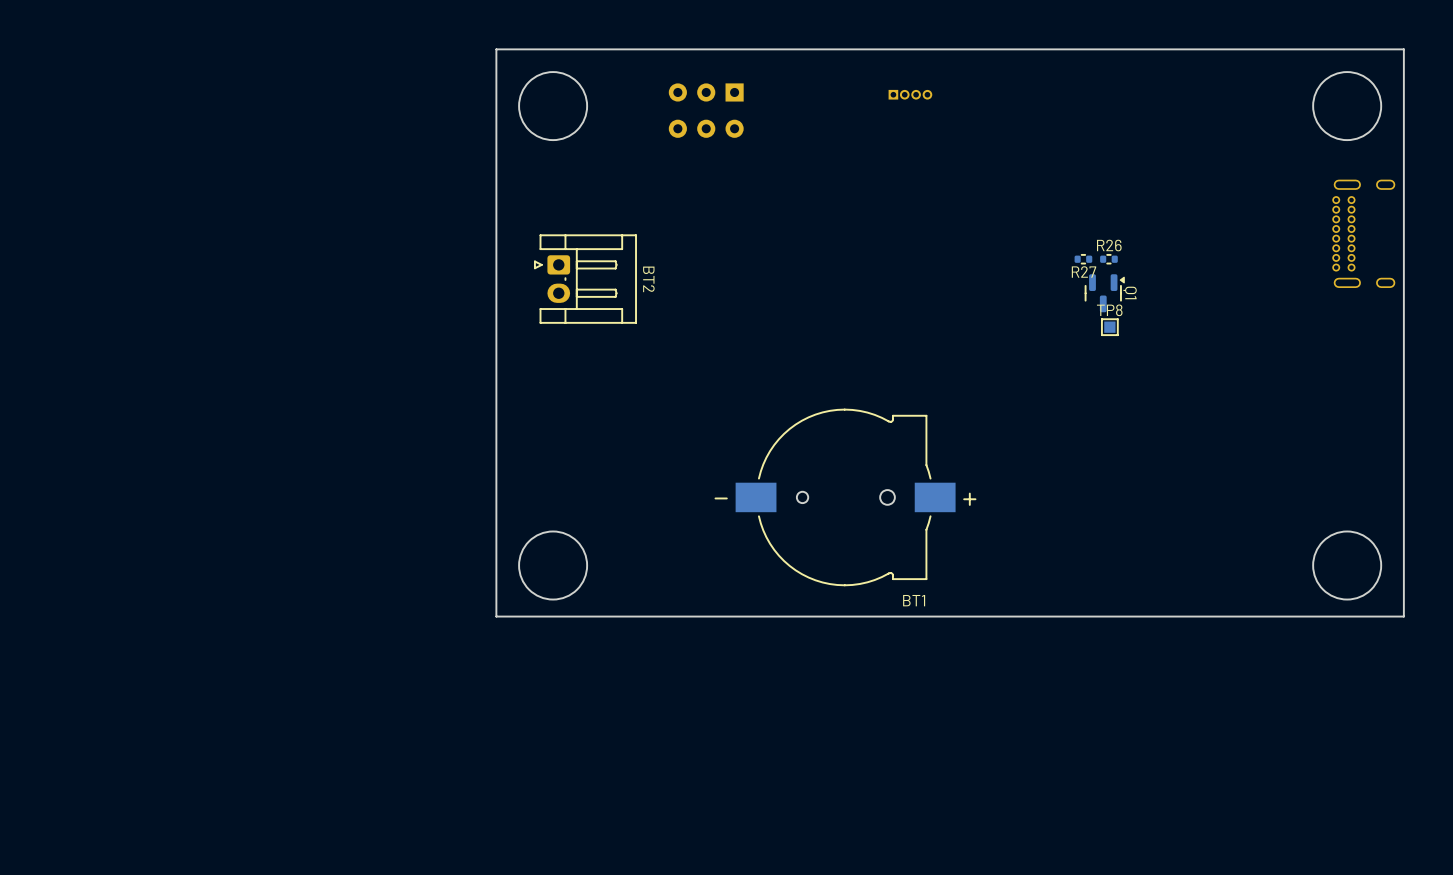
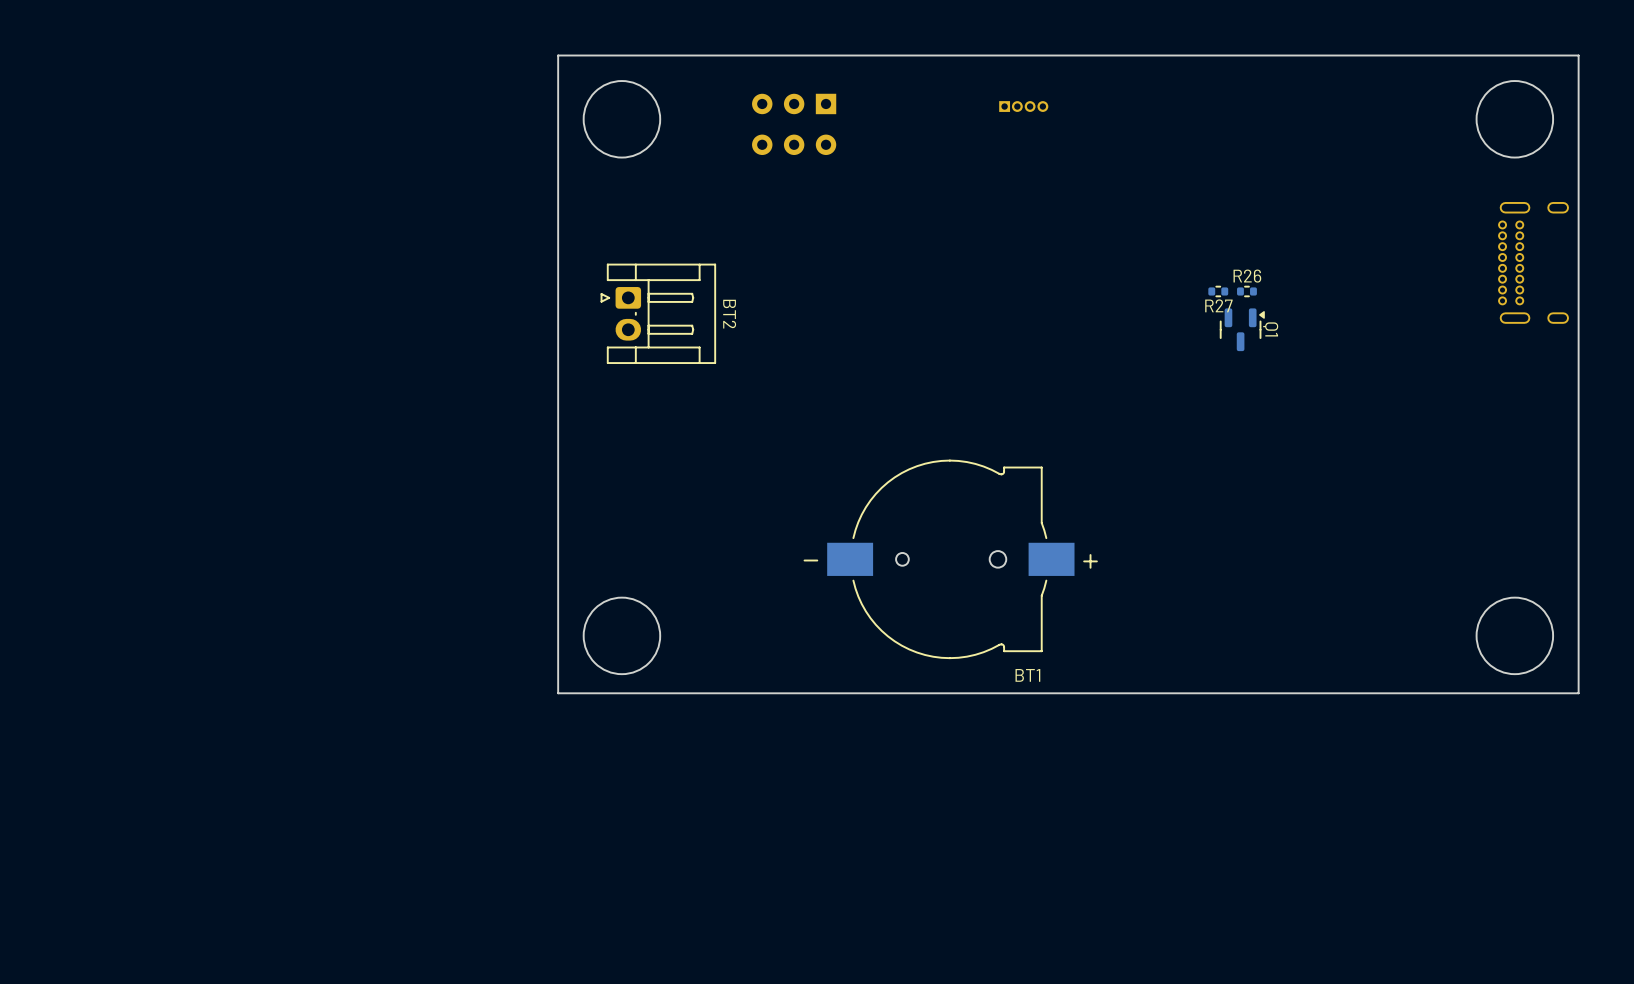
TP8: (1109, 327) -> none

